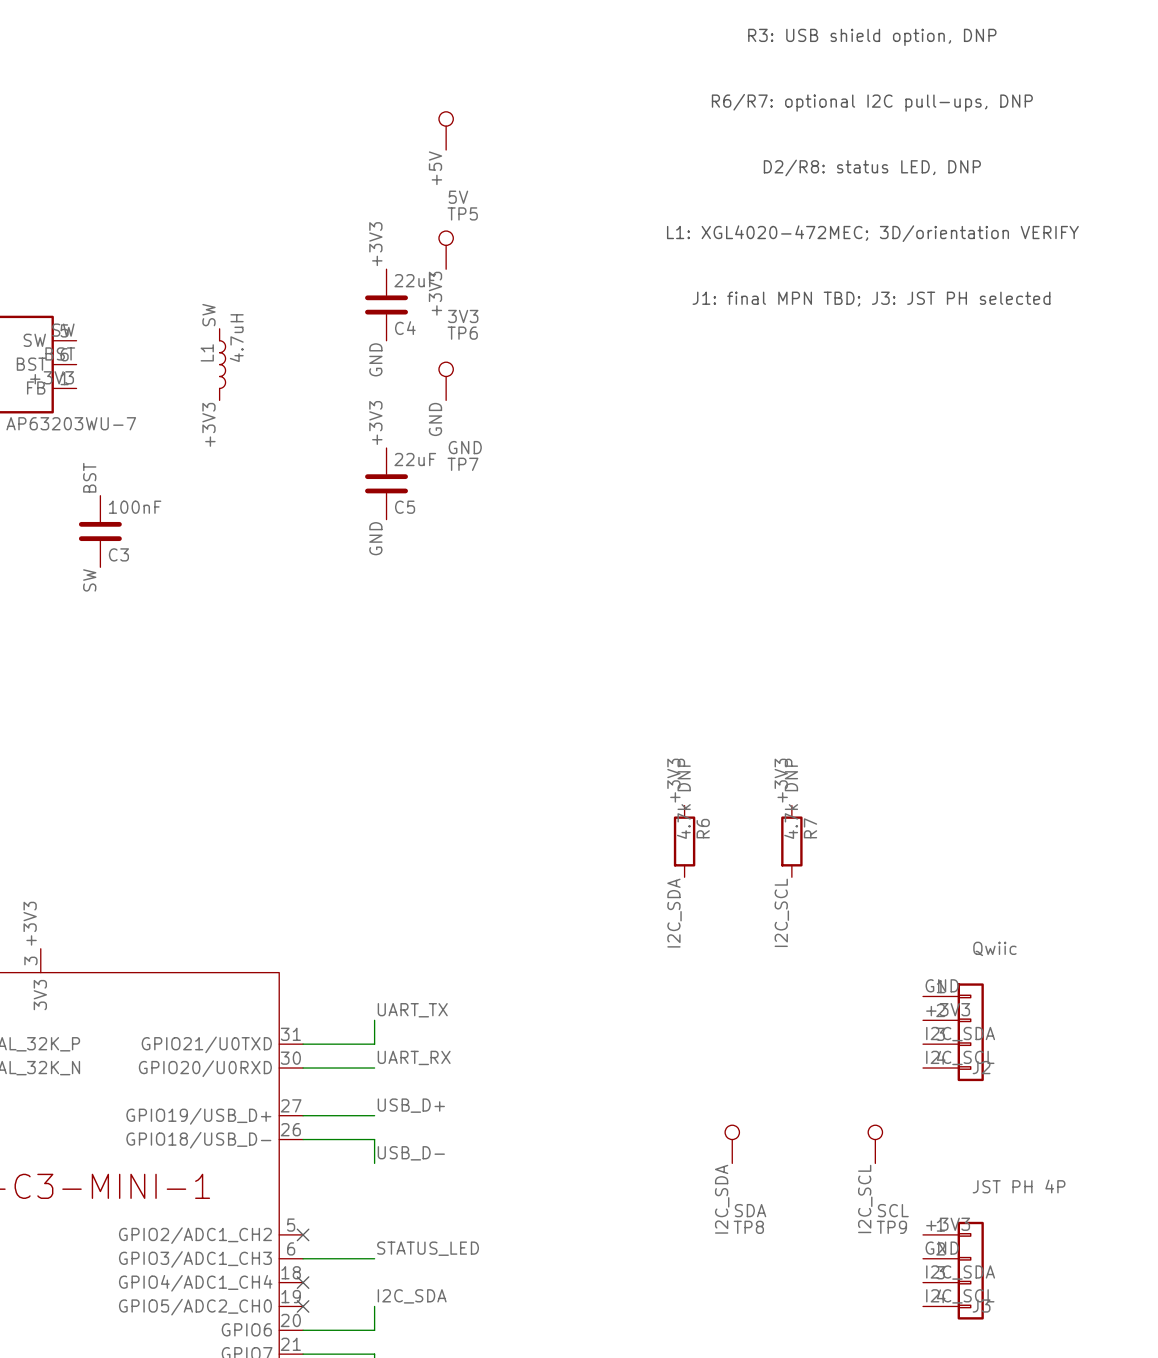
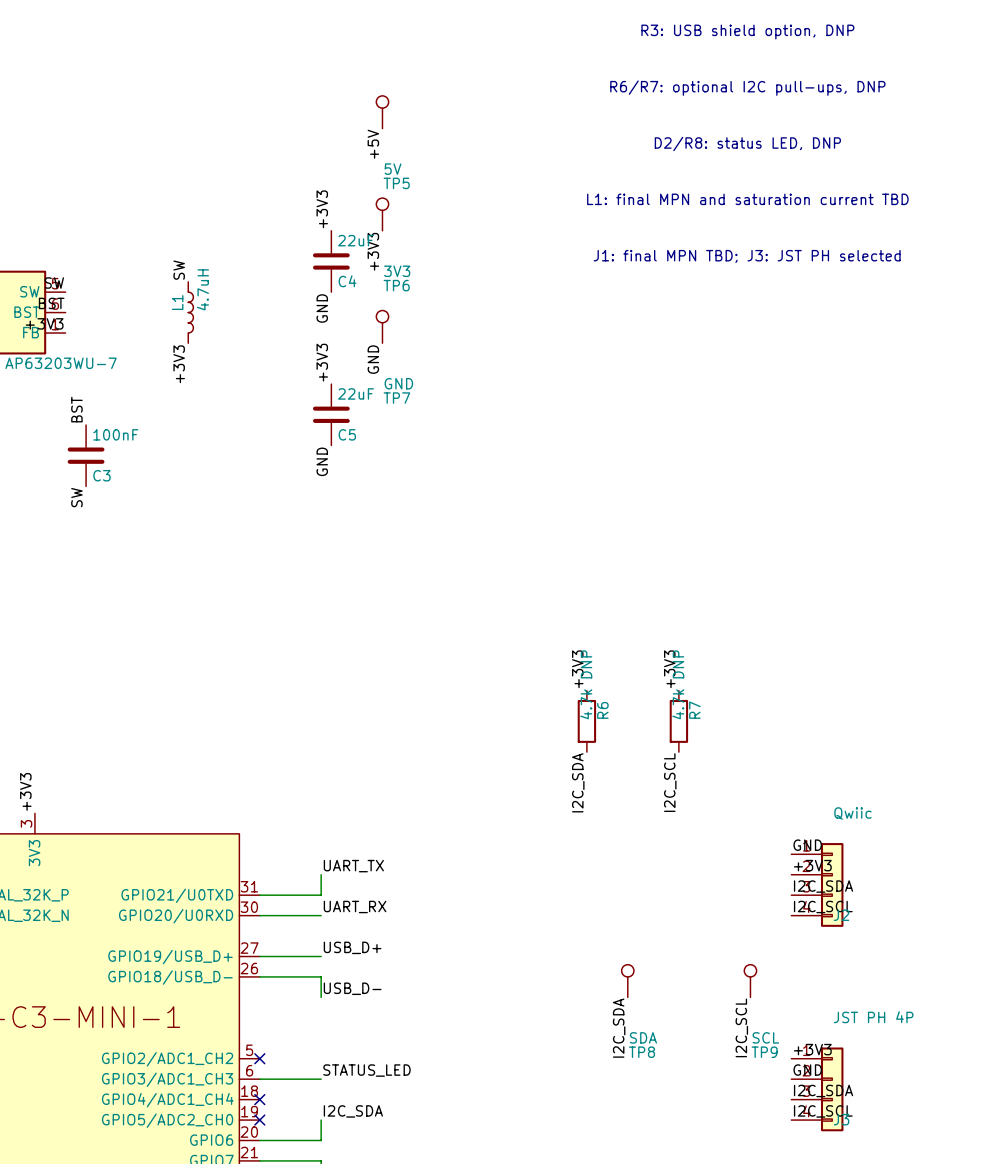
text: L1: XGL4020-472MEC; 3D/orientation VERIFY (872, 233) -> L1: final MPN and saturation current TBD (747, 199)

